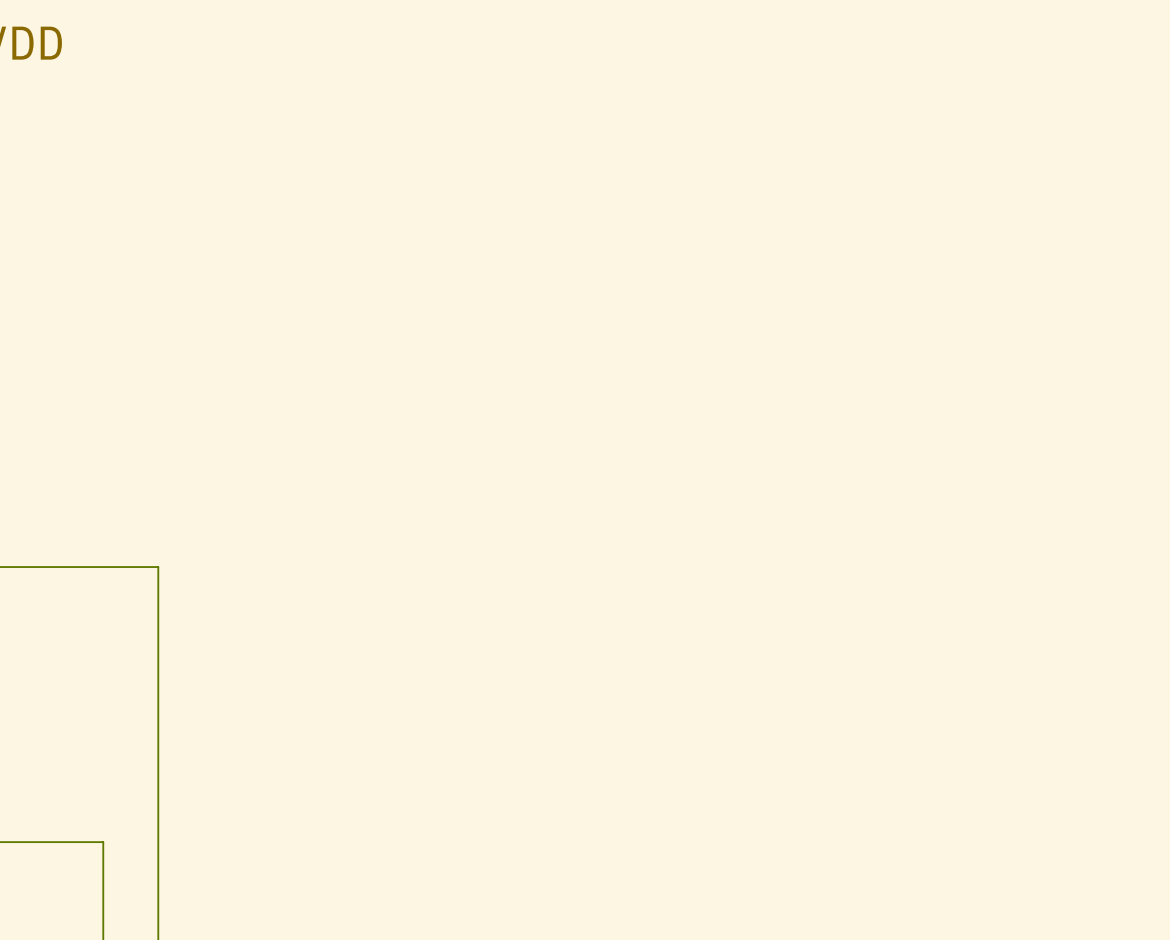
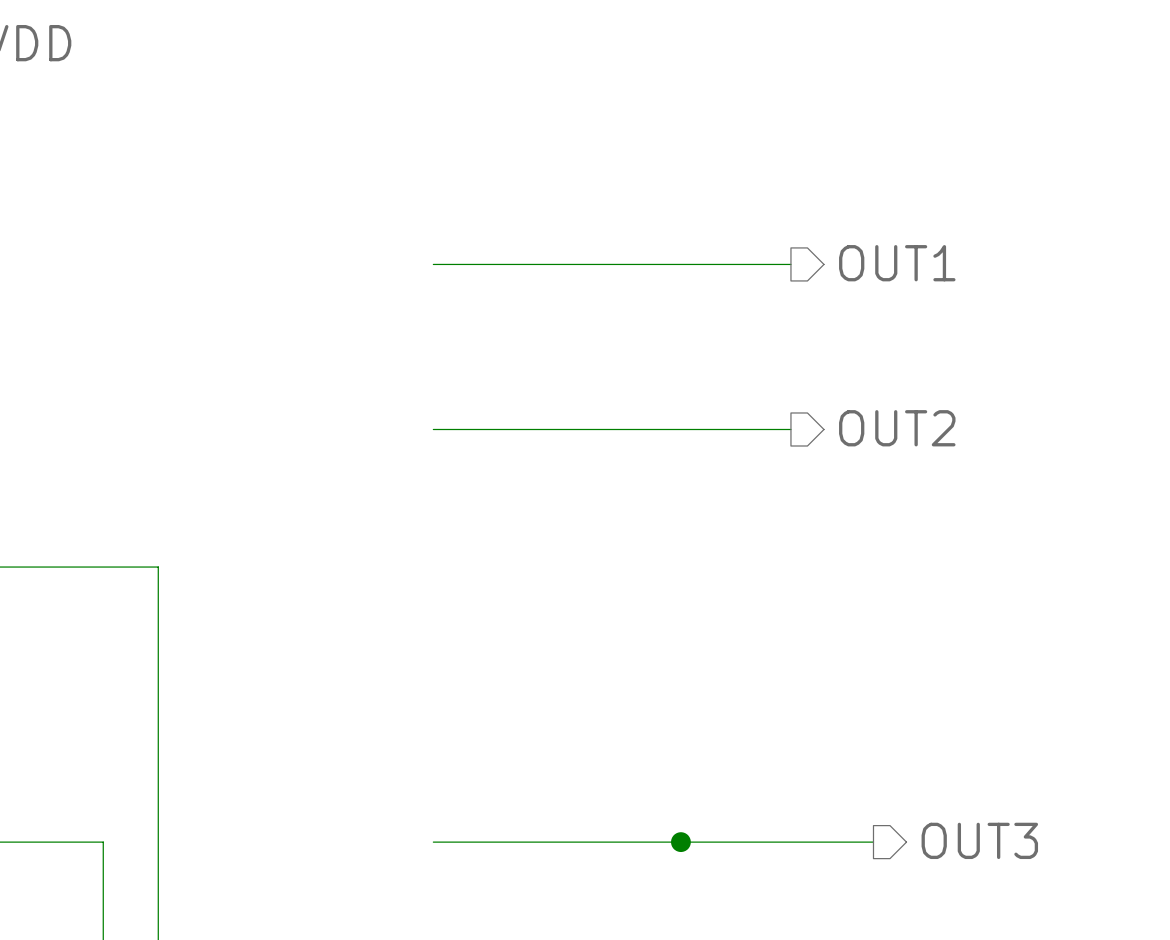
hierarchical label: none -> OUT1 (897, 263)
wire: none -> (433, 264) (790, 264)
hierarchical label: none -> OUT2 (897, 428)
wire: none -> (433, 429) (790, 429)
hierarchical label: none -> OUT3 (979, 840)
wire: none -> (433, 842) (873, 842)
junction: none -> (680, 842)

